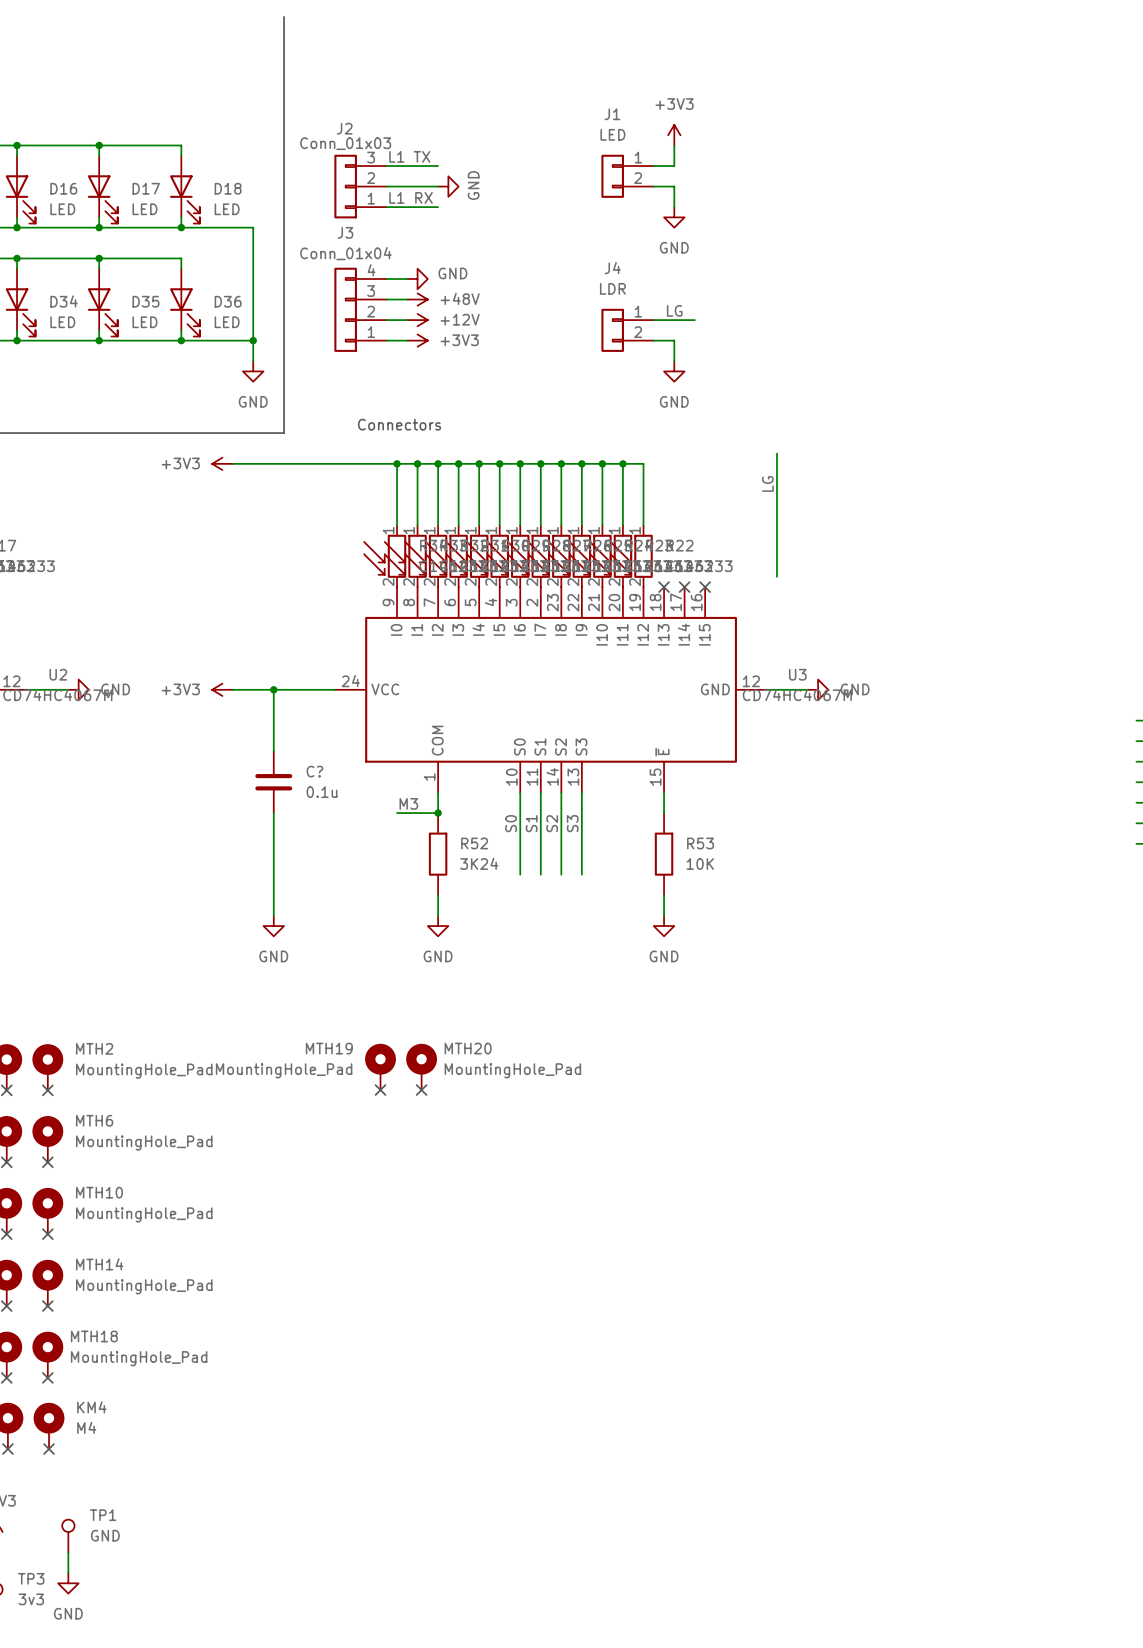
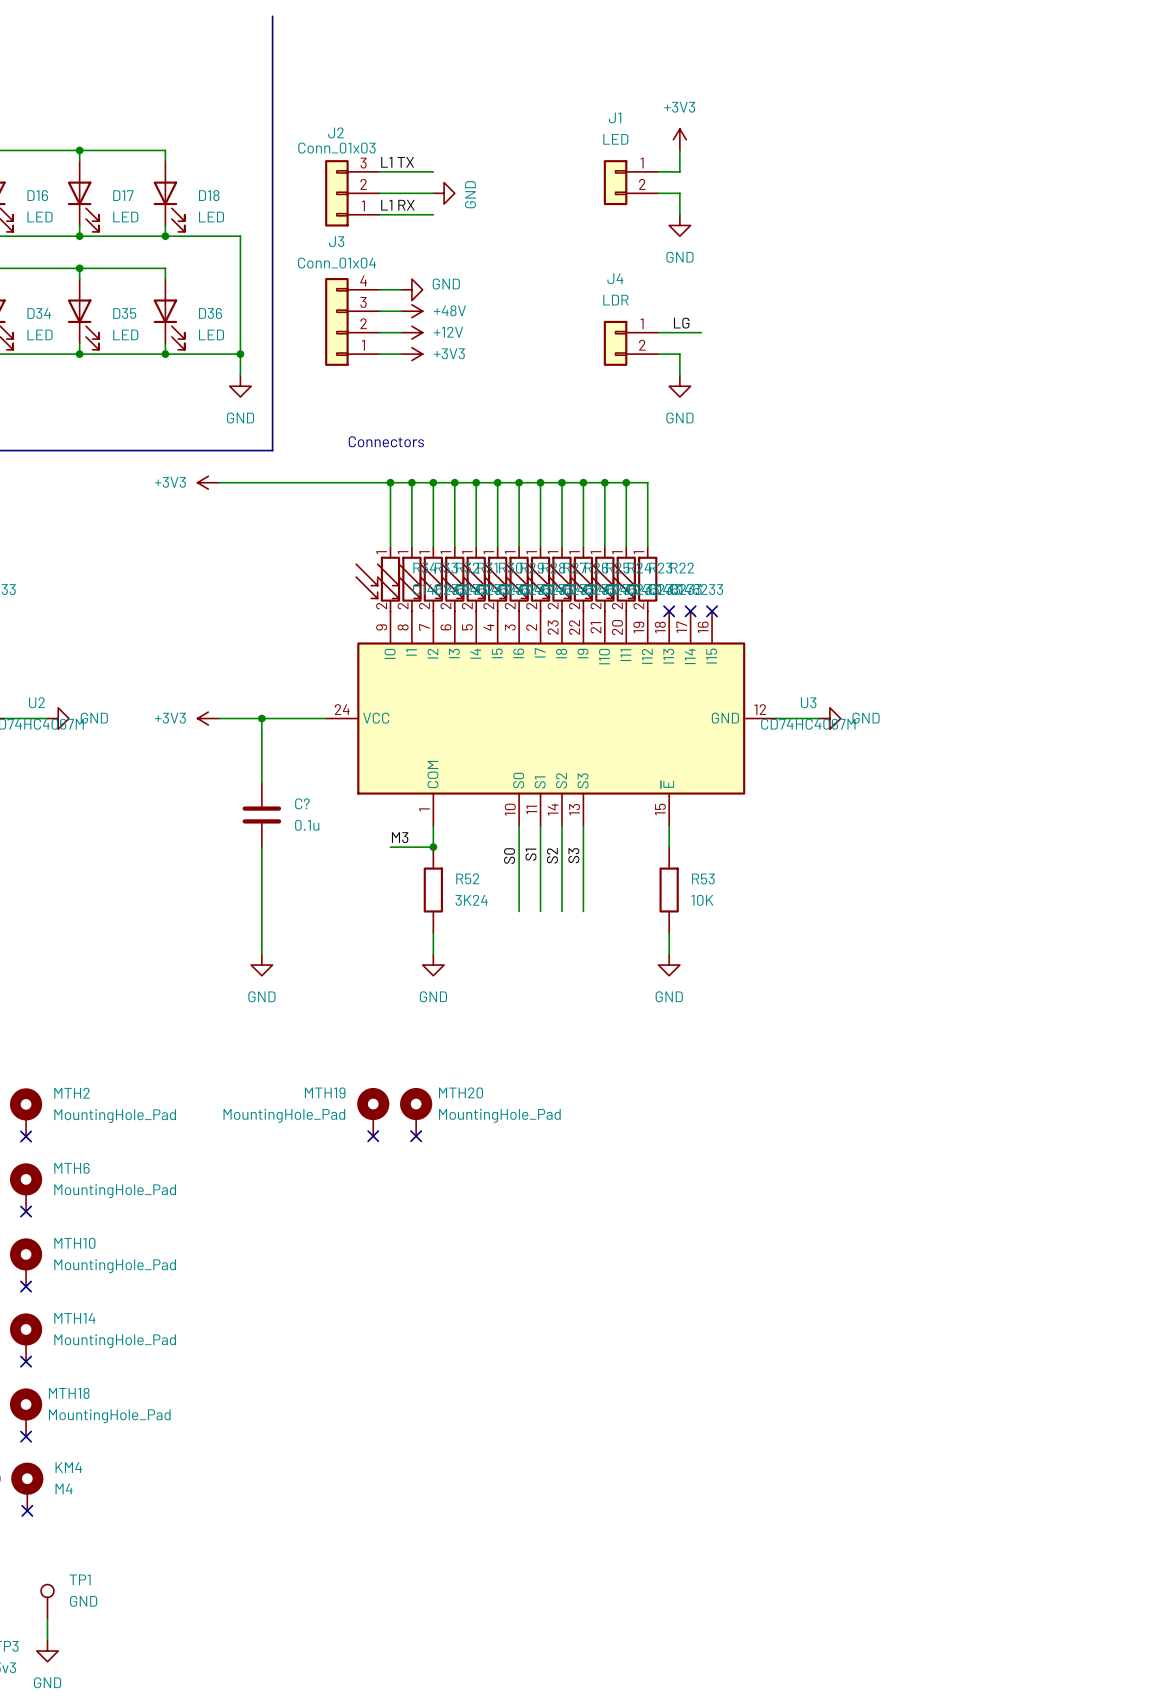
wire: (777, 453) (777, 576) -> none
label: LG (767, 483) -> none

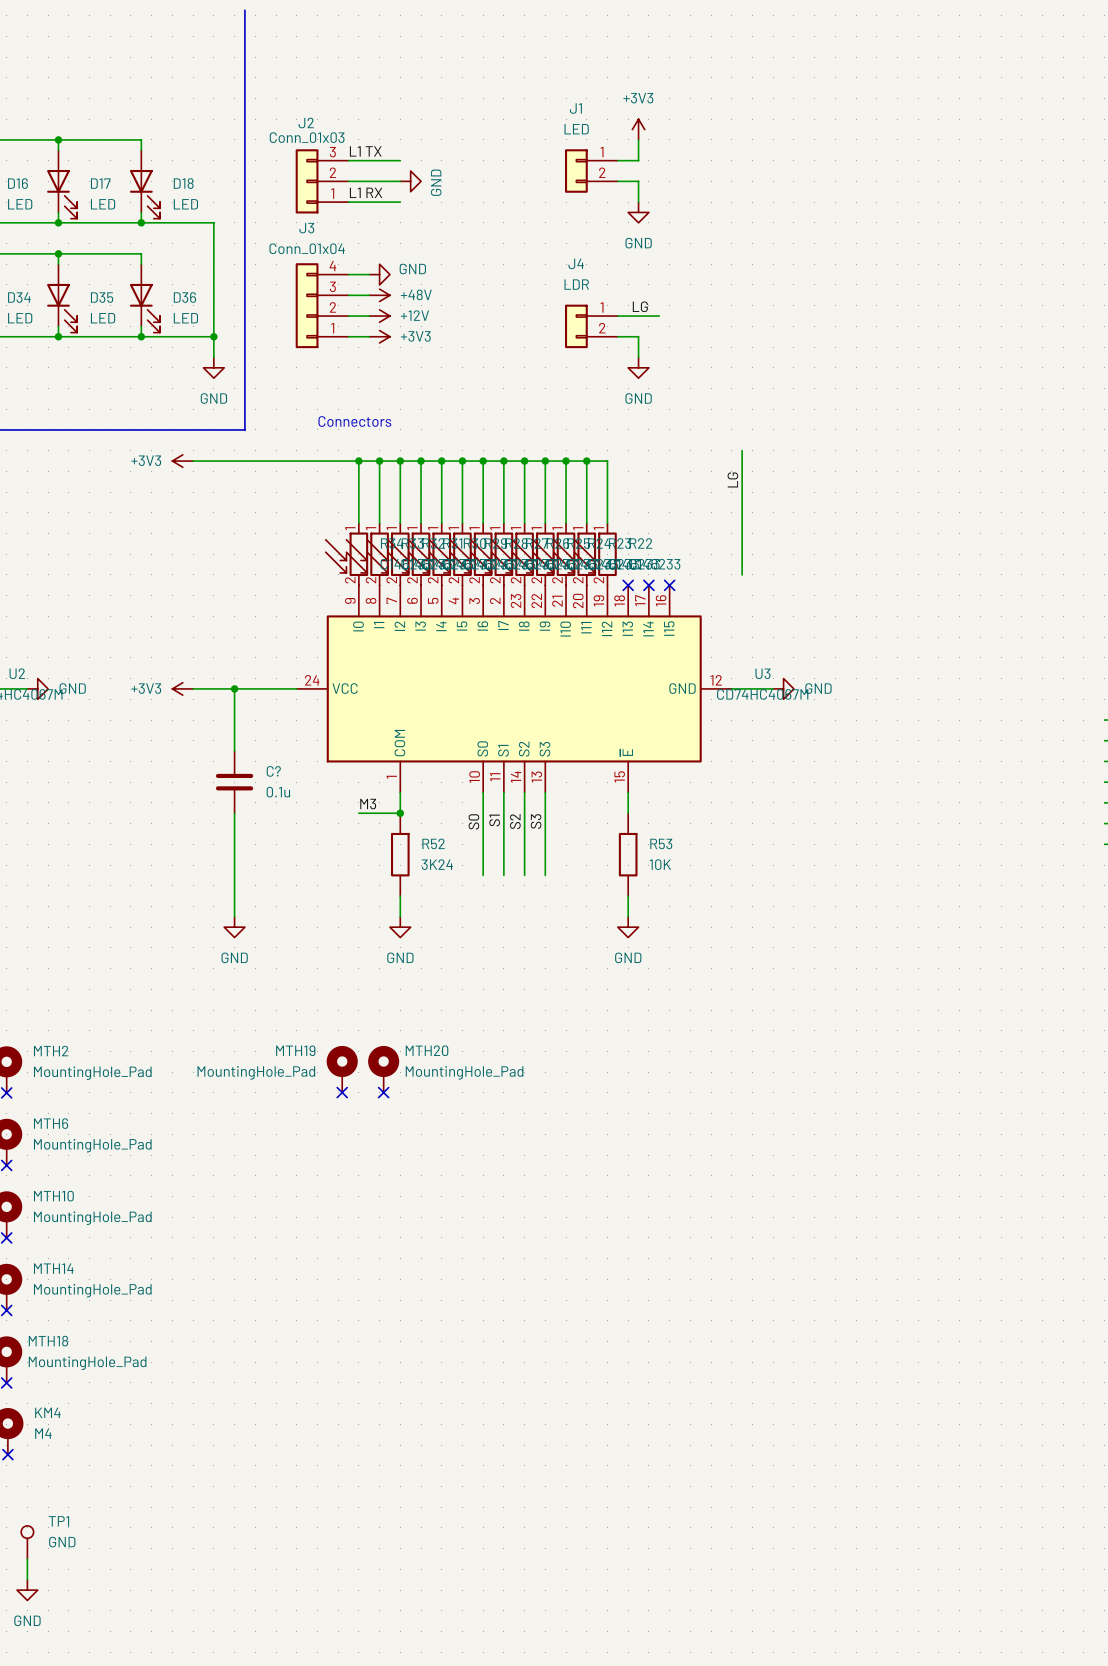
wire: none -> (742, 450) (742, 574)
label: none -> LG (732, 479)

